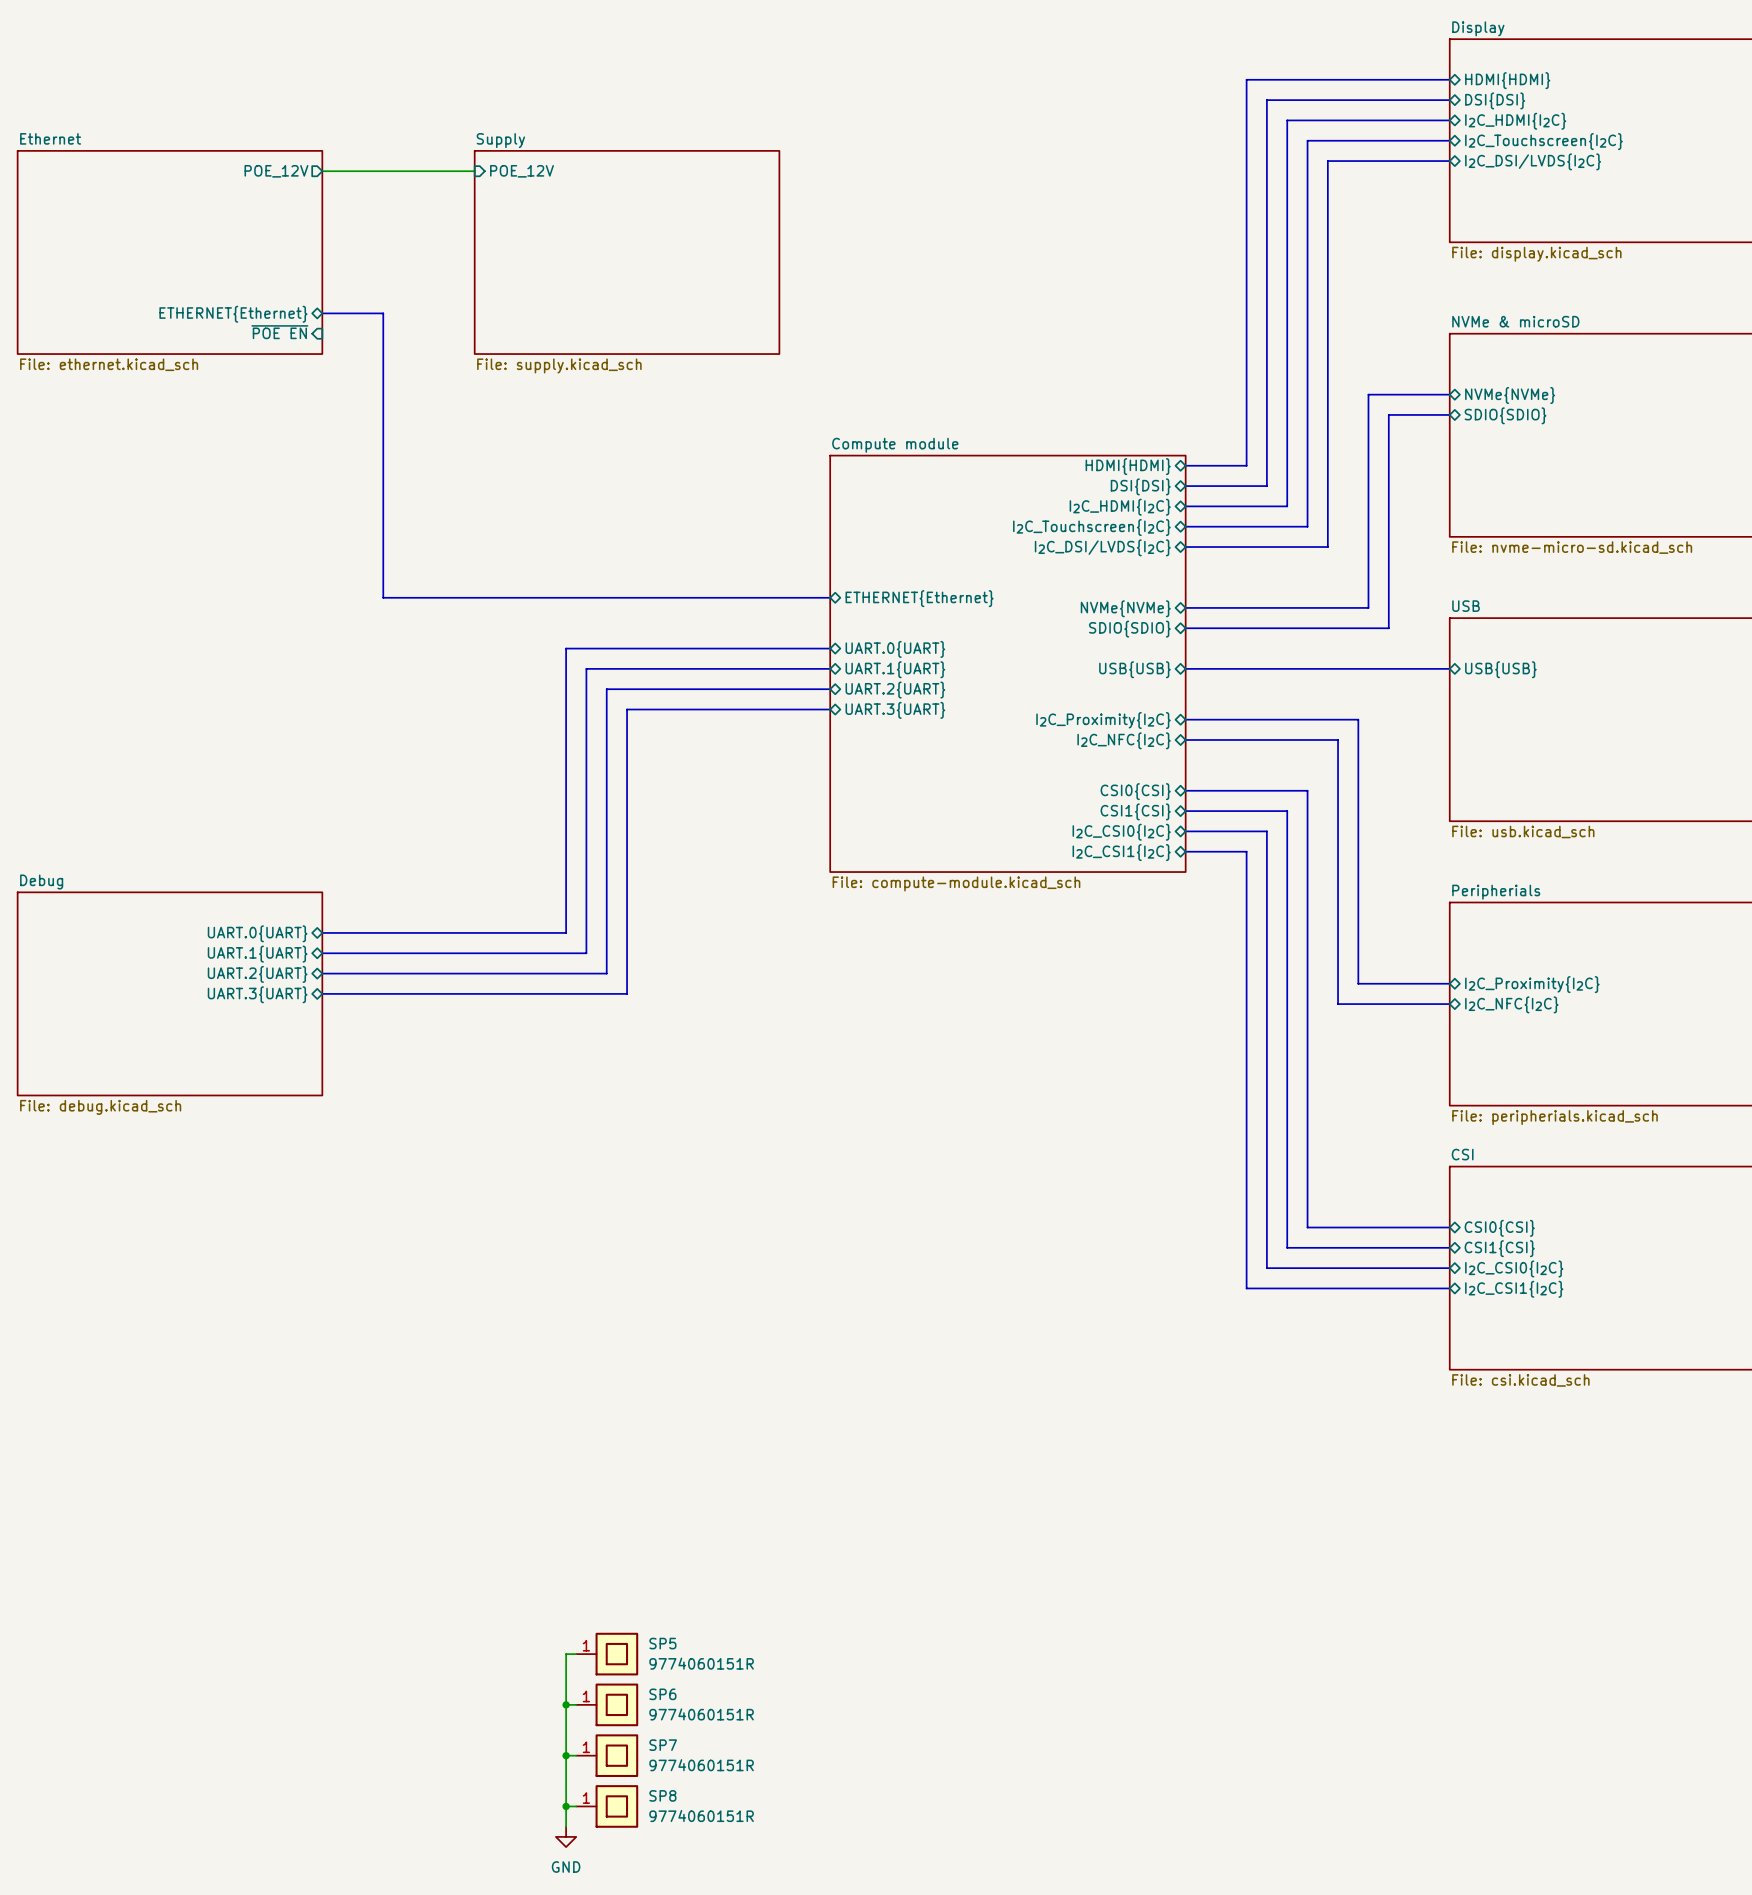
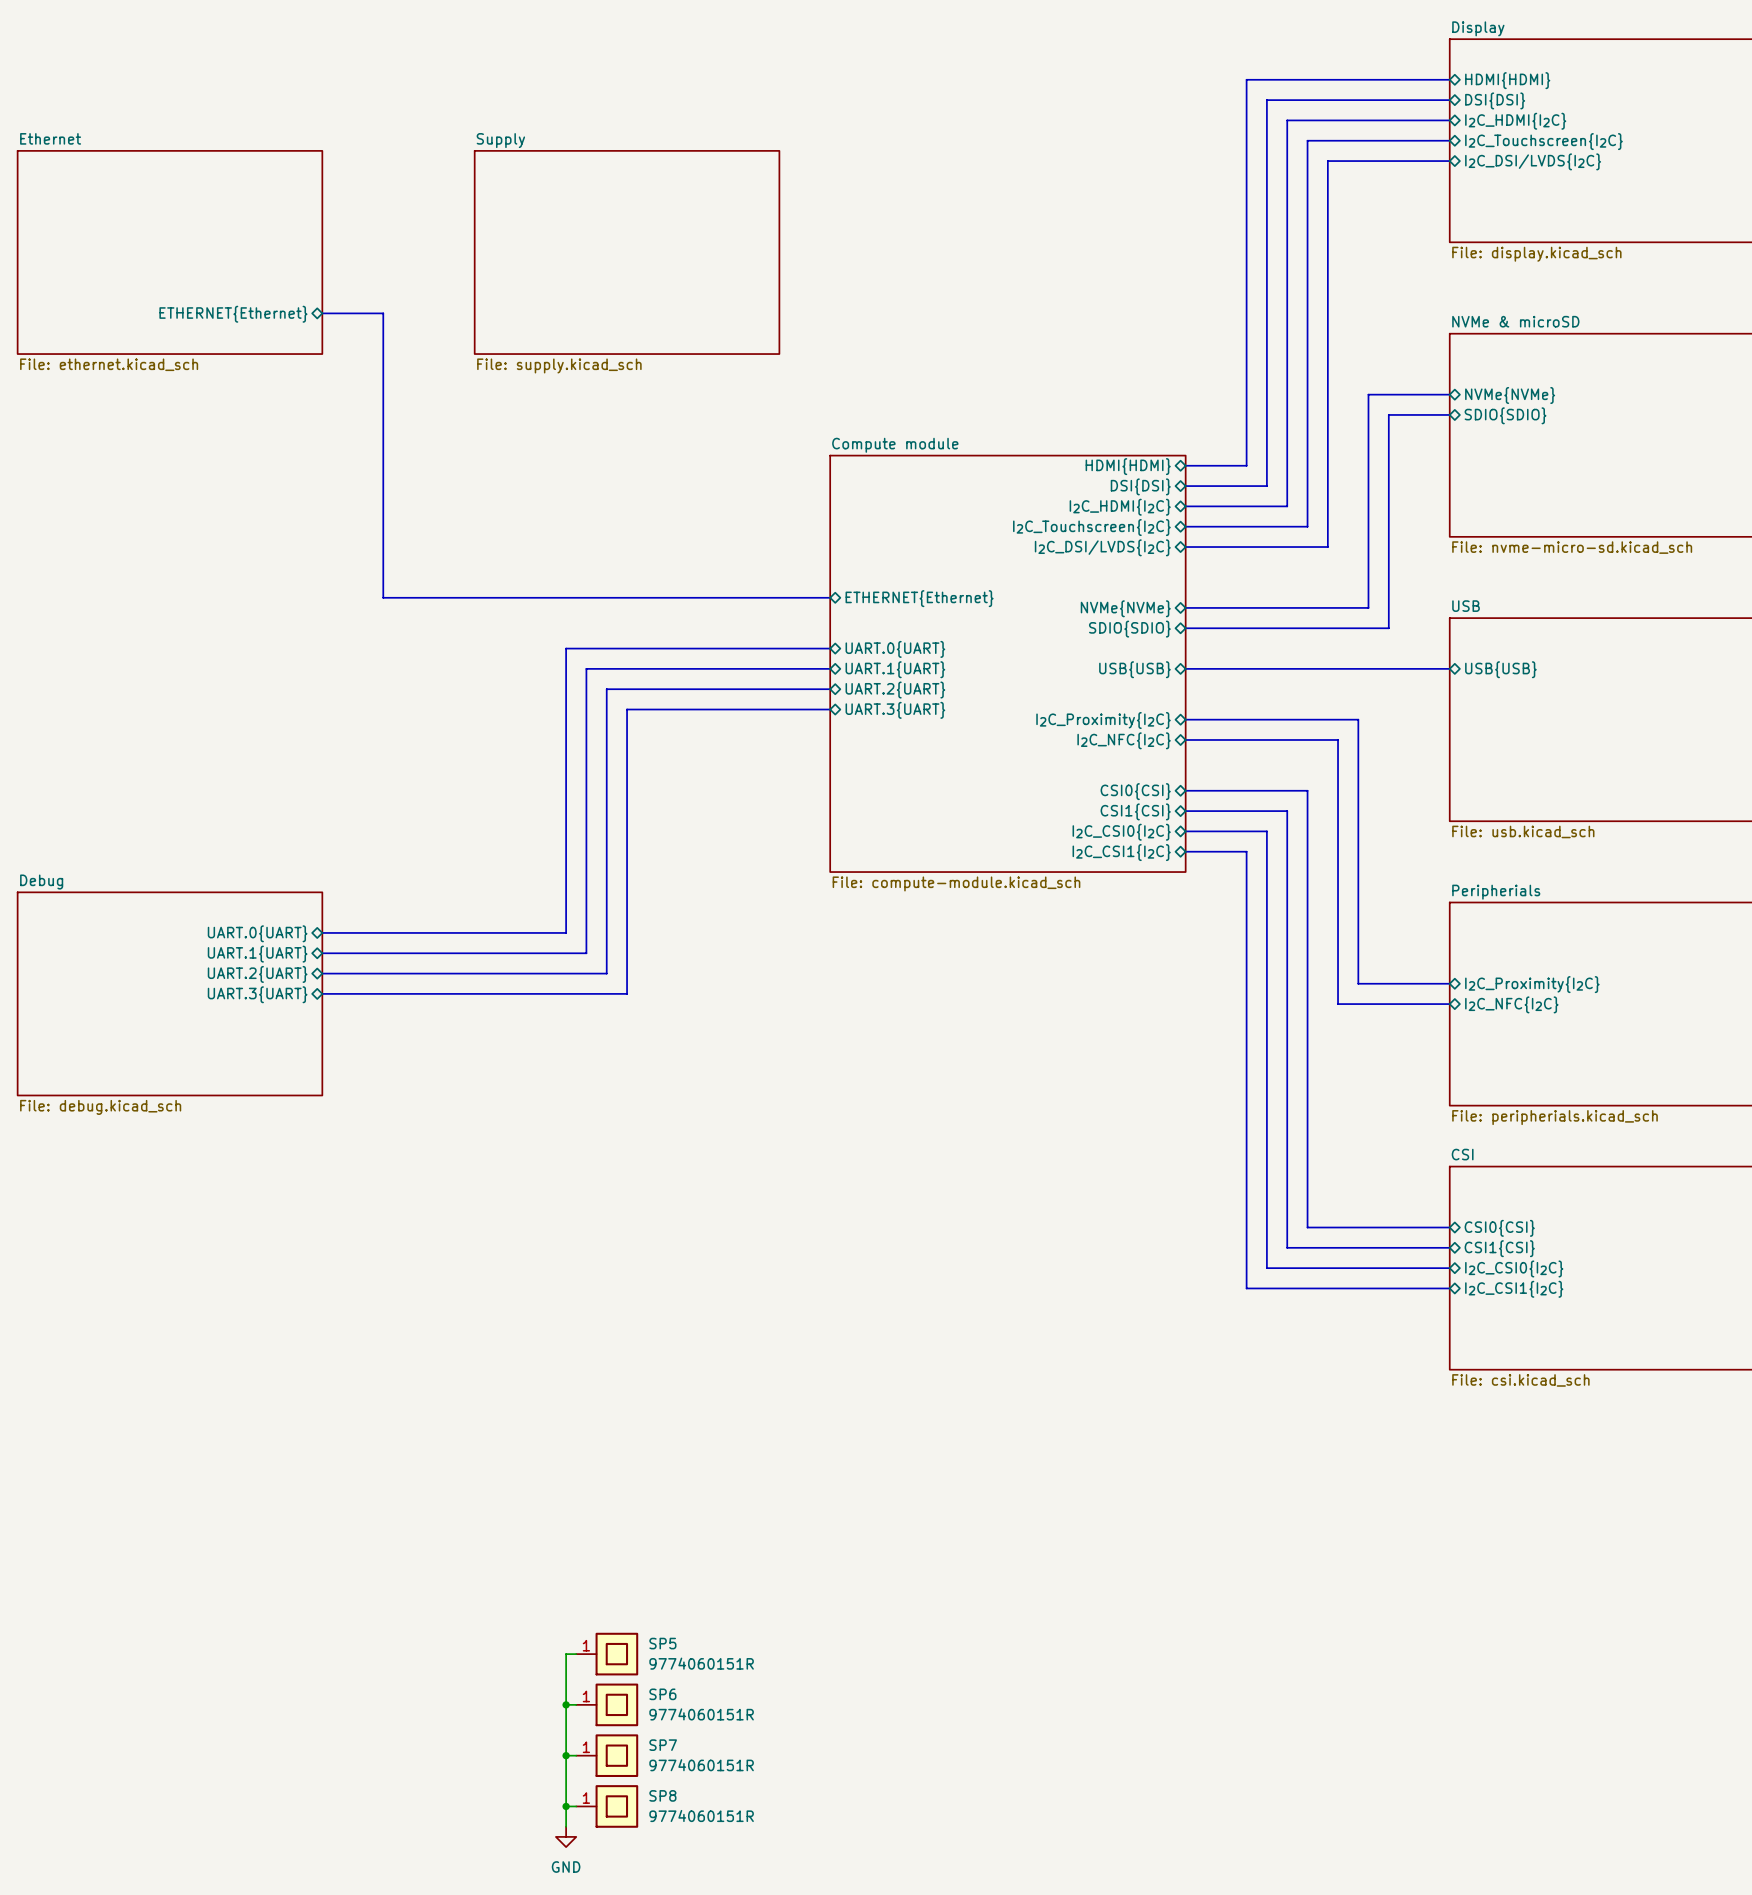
sheet pin: POE_12V (276, 171) -> none
wire: (322, 171) (474, 171) -> none
sheet pin: POE_12V (522, 171) -> none
sheet pin: ~{POE EN} (279, 332) -> none

